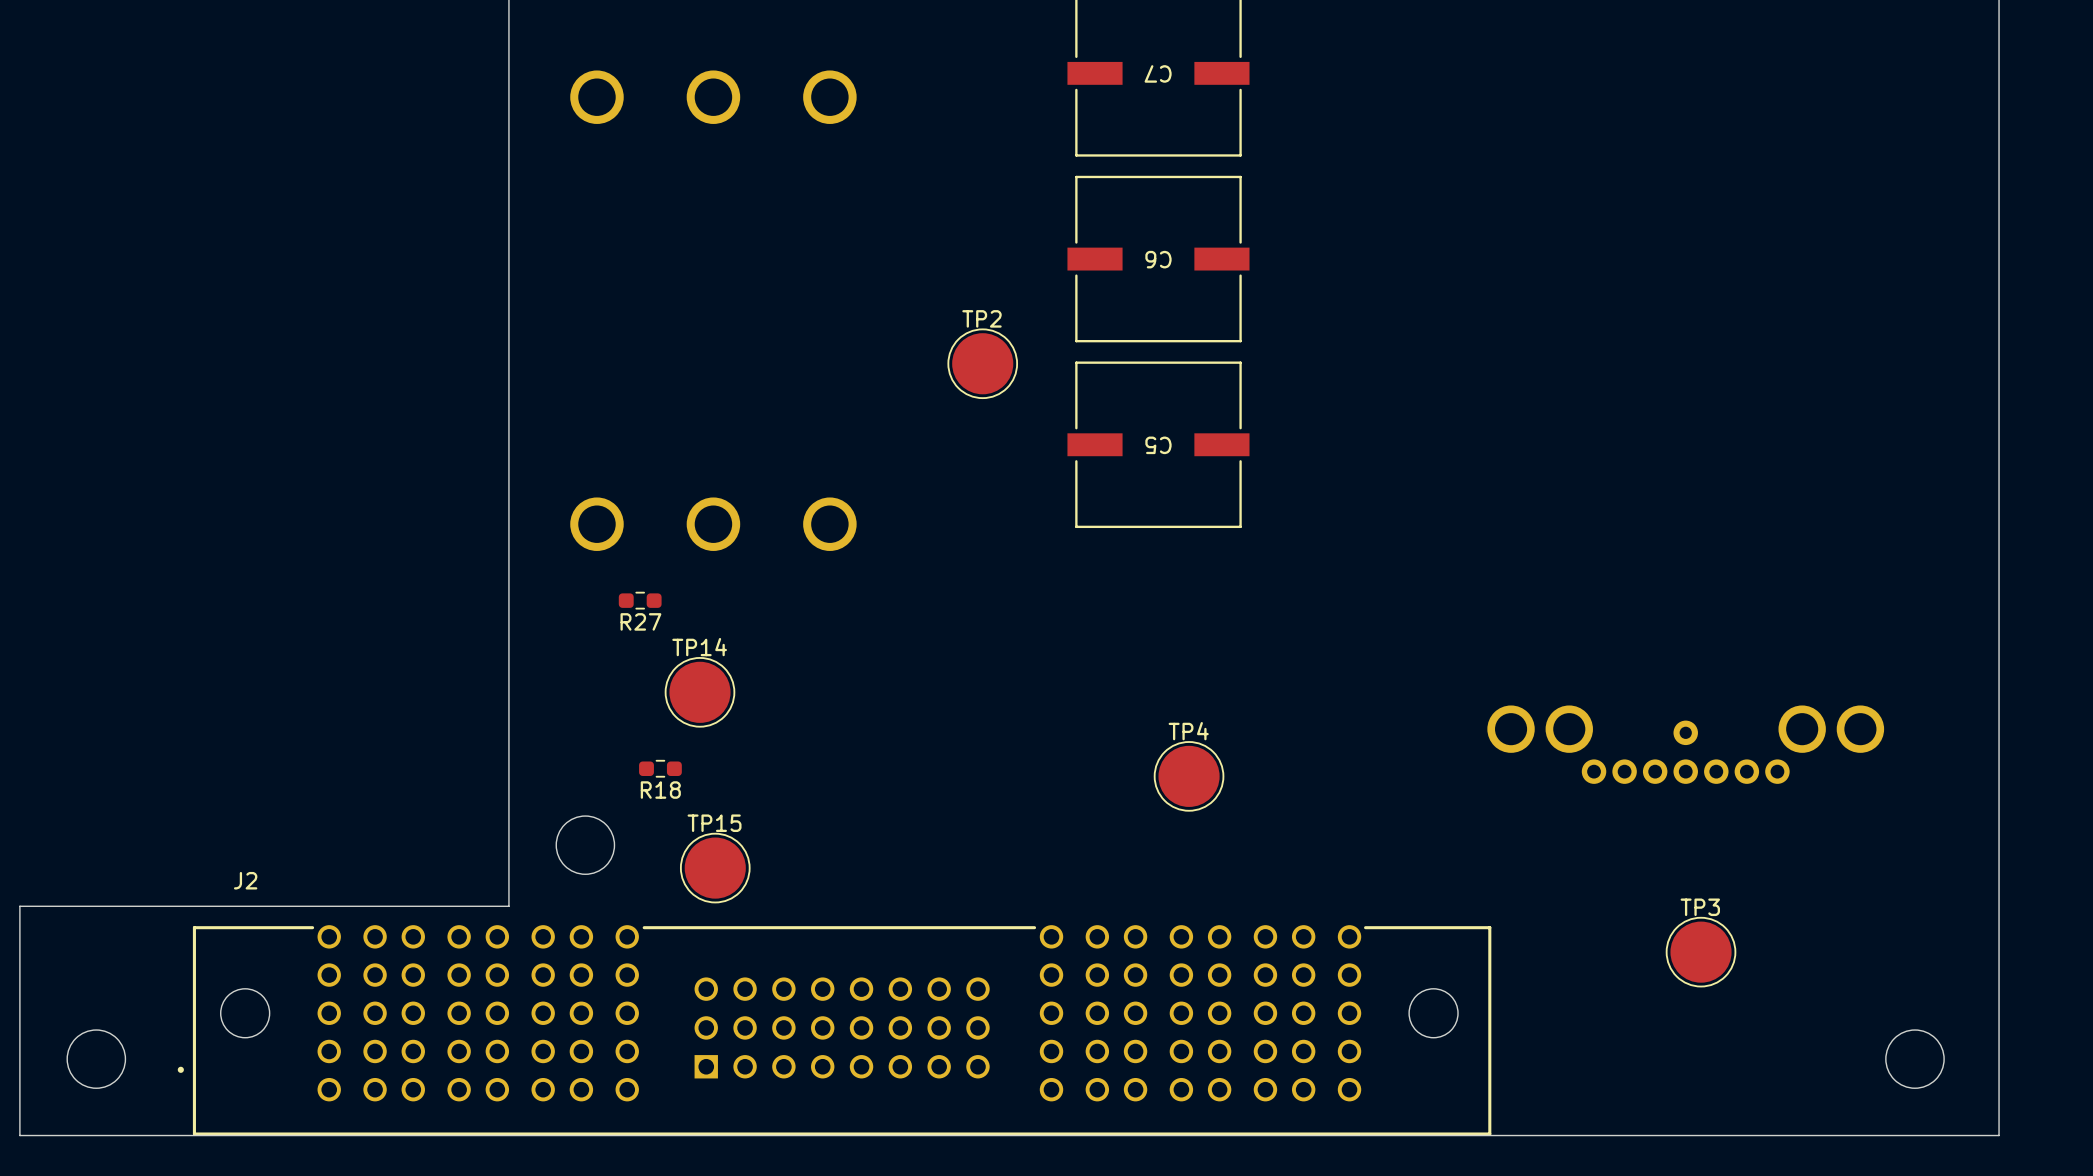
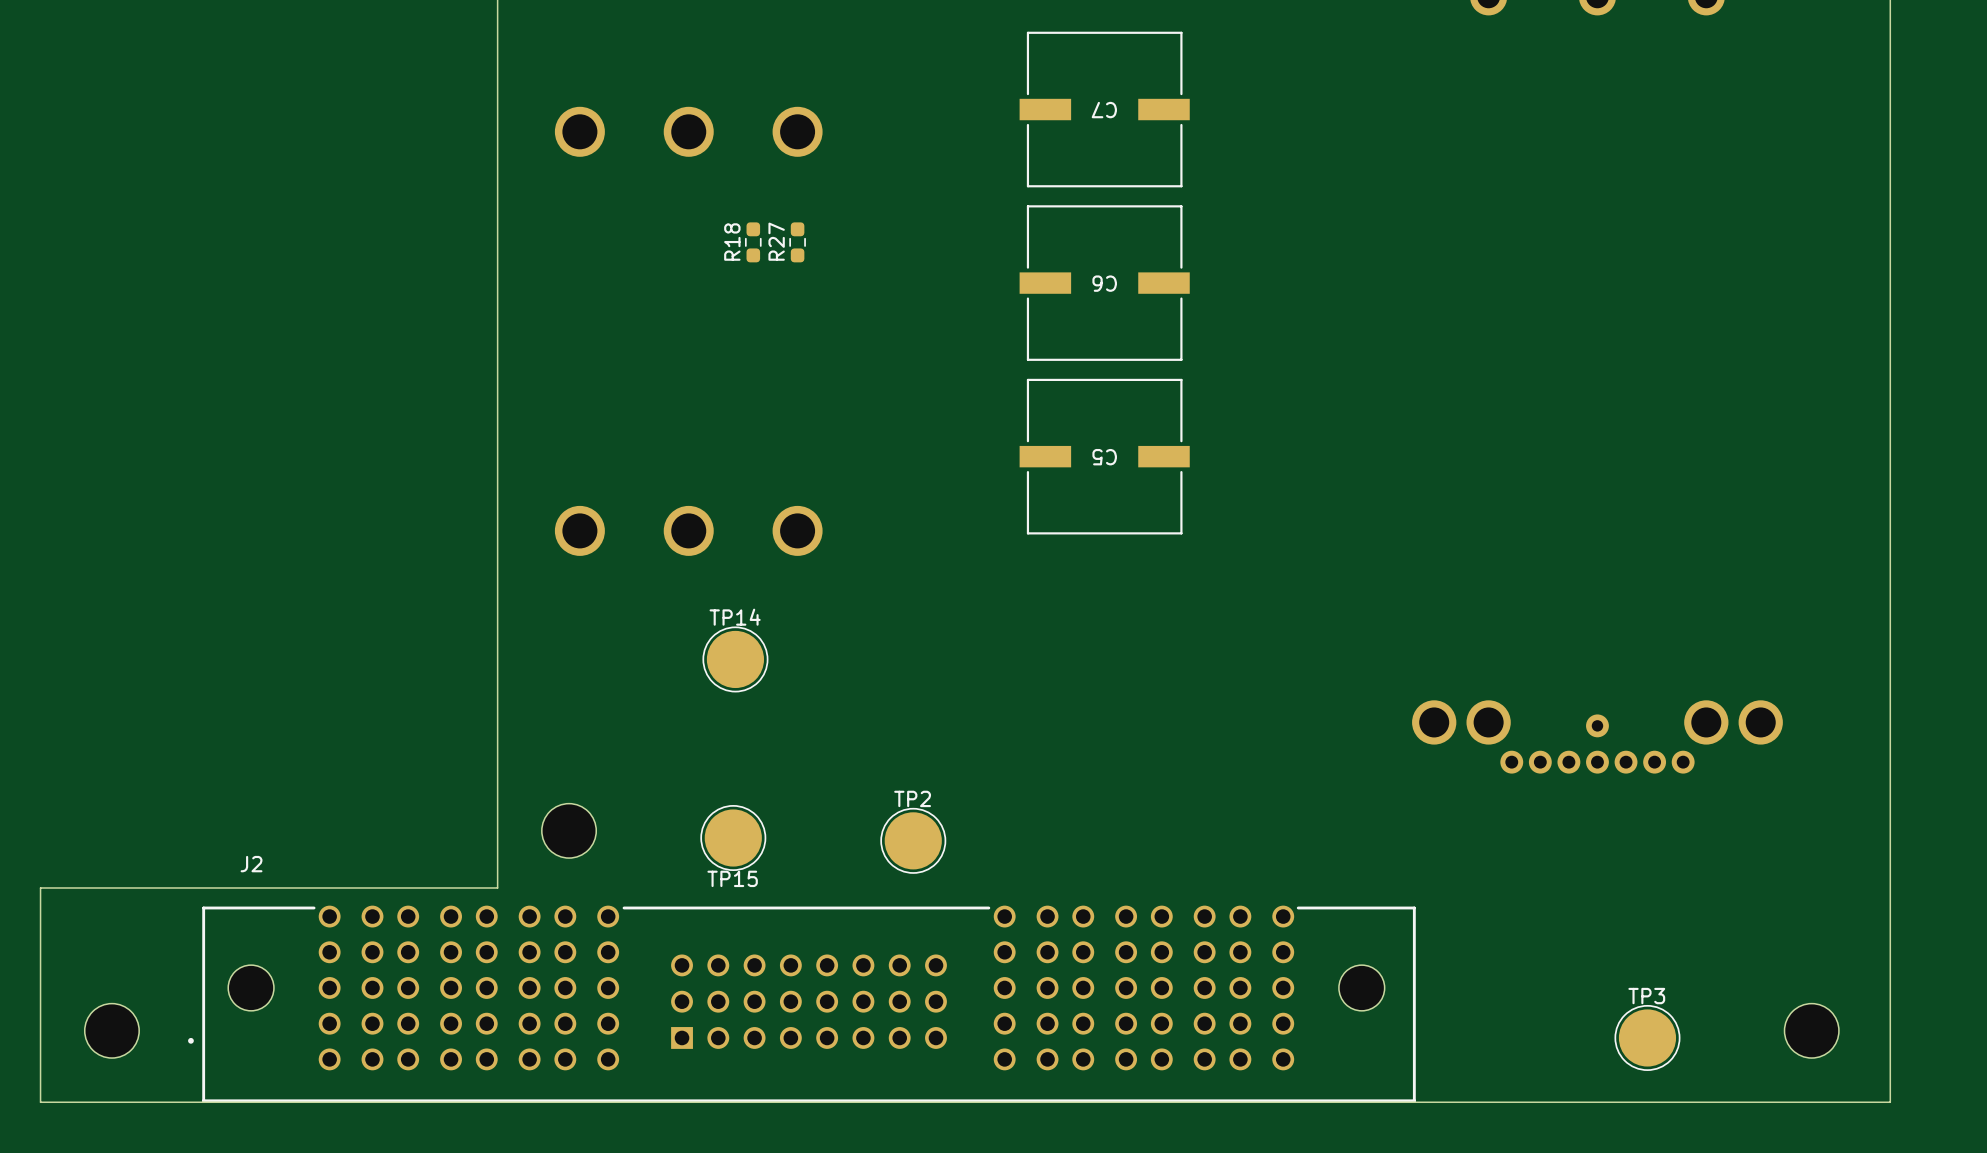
TP2 position: (982, 363) -> (913, 840)
R27 rotation: 0° (640, 600) -> 90° clockwise (797, 242)
R27 position: (640, 600) -> (797, 242)
TP14 position: (699, 692) -> (735, 659)
R18 rotation: 0° (660, 768) -> 90° clockwise (753, 242)
R18 position: (660, 768) -> (753, 242)
TP4: (1189, 776) -> none
TP15 name position: TP15 (714, 823) -> TP15 (732, 878)
TP15 position: (715, 868) -> (733, 838)
TP3 position: (1701, 952) -> (1647, 1037)

